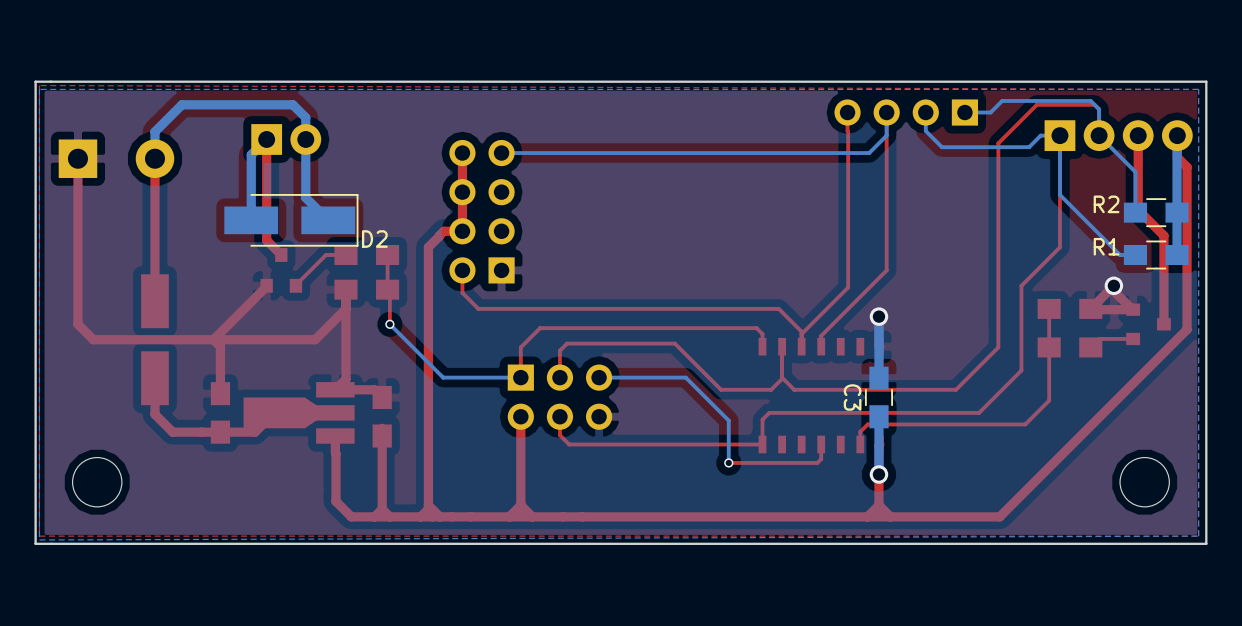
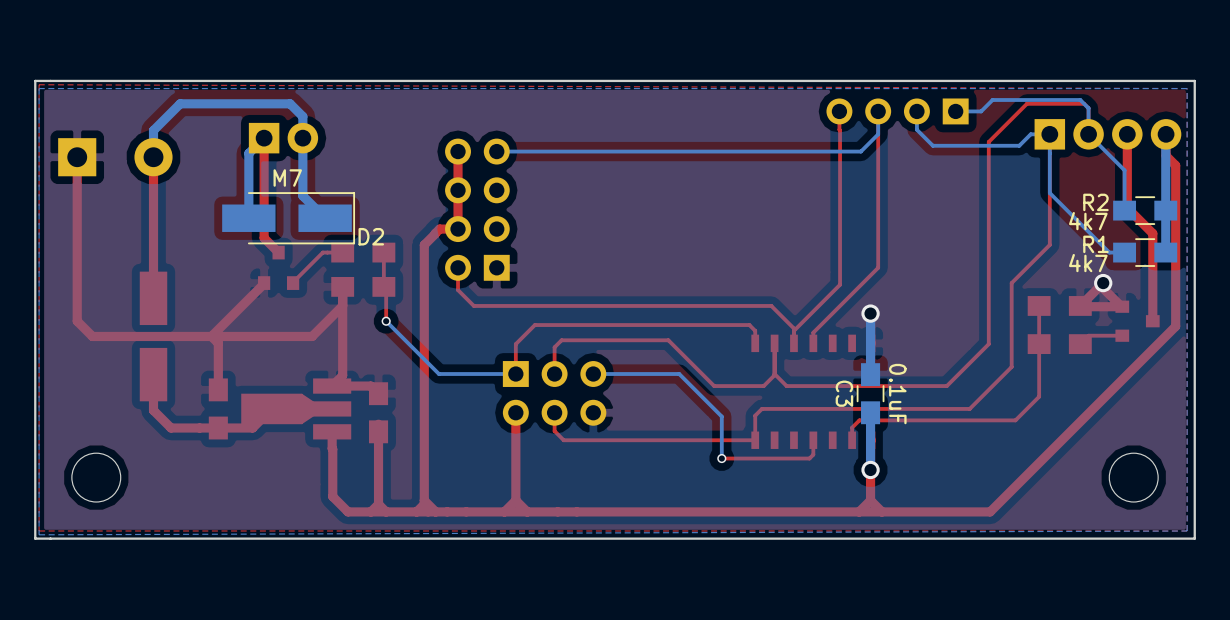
D2 value: none -> M7 (287, 178)
R2 value: none -> 4k7 (1088, 221)
R1 value: none -> 4k7 (1088, 263)
C3 value: none -> 0.1uF (897, 394)

